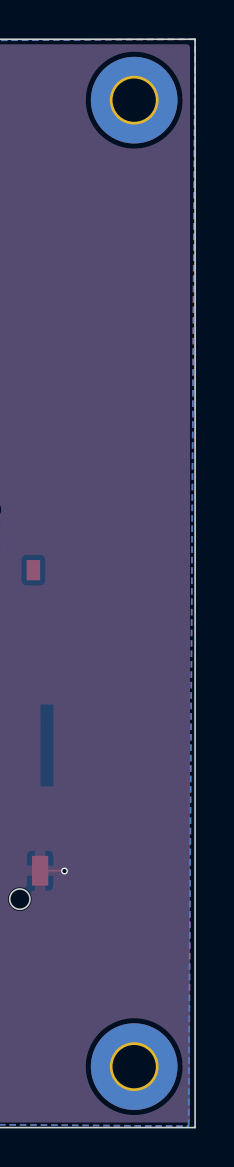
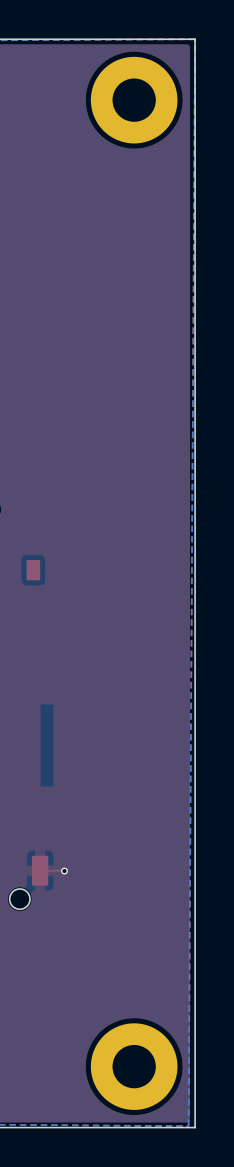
part footprint: [90, 56, 178, 144] -> [90, 56, 178, 144]
part footprint: [90, 1023, 178, 1110] -> [90, 1023, 178, 1110]

